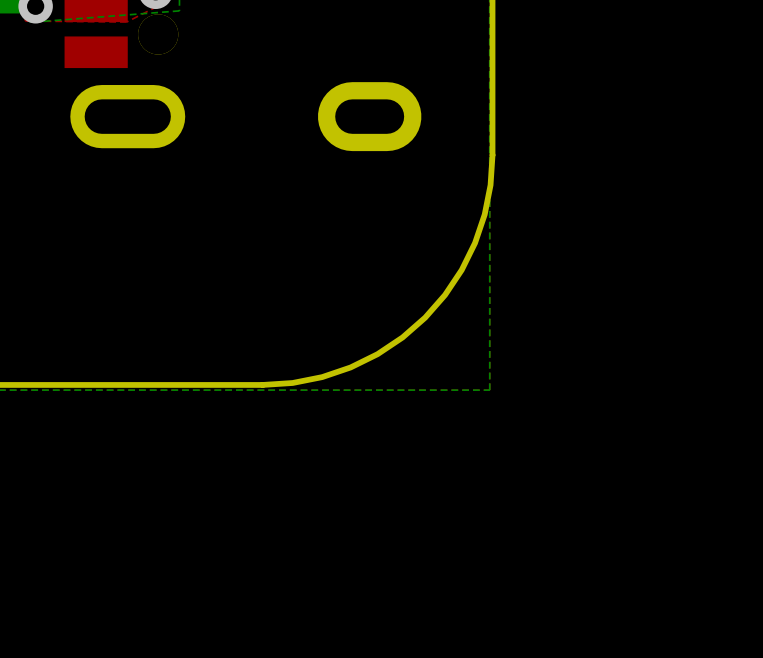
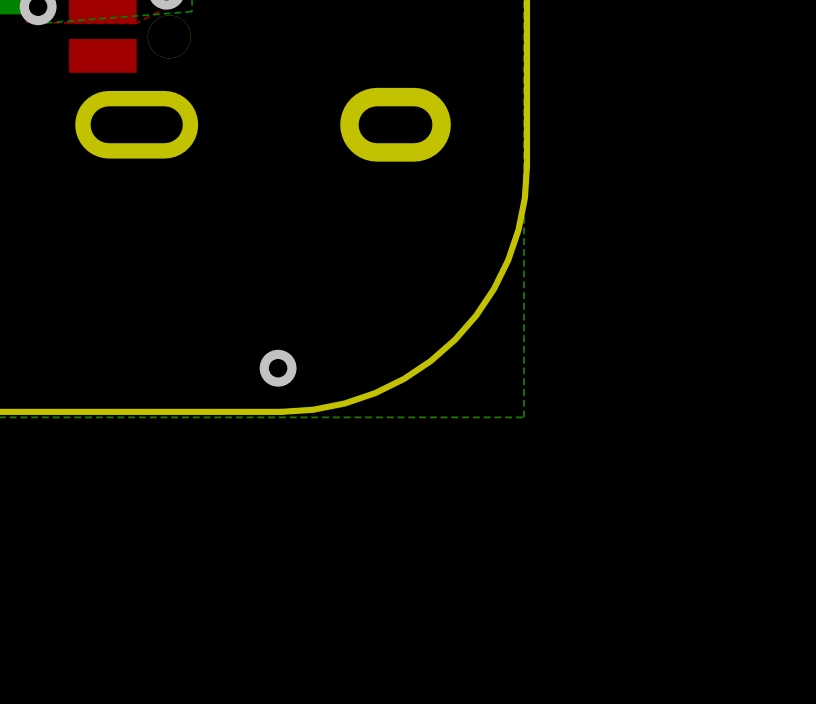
via: none -> (278, 368)

